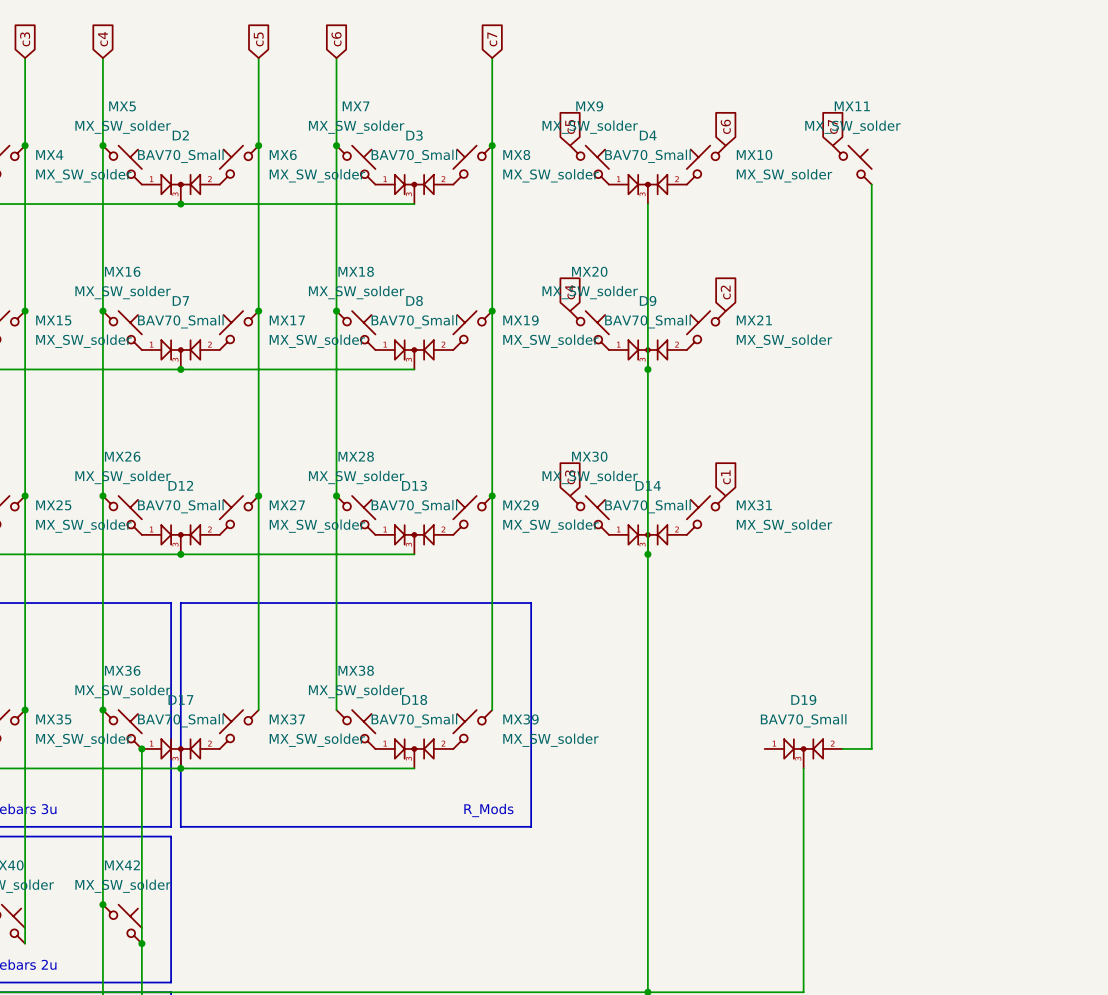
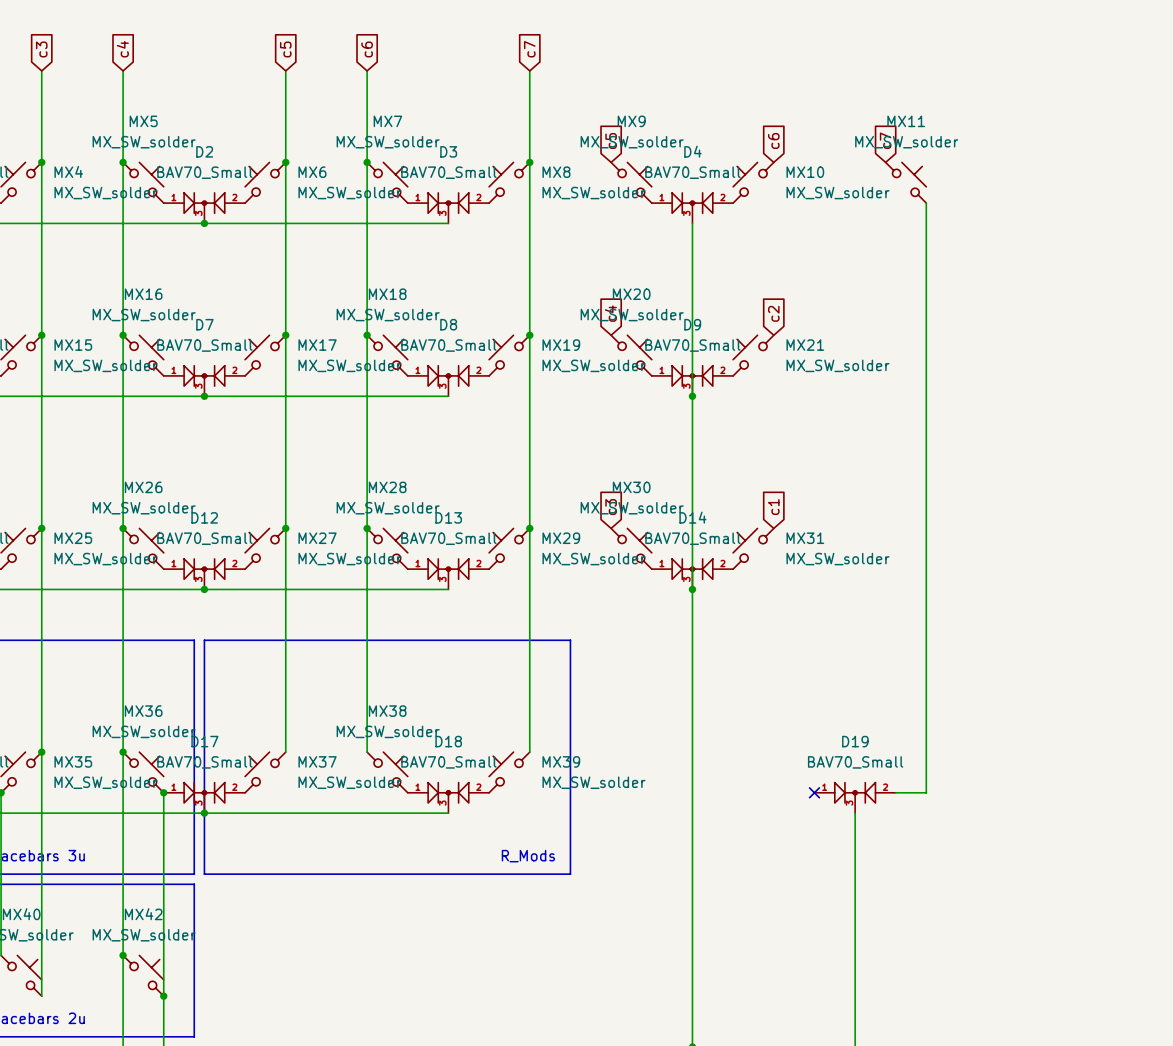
no-connect mark: none -> (814, 792)

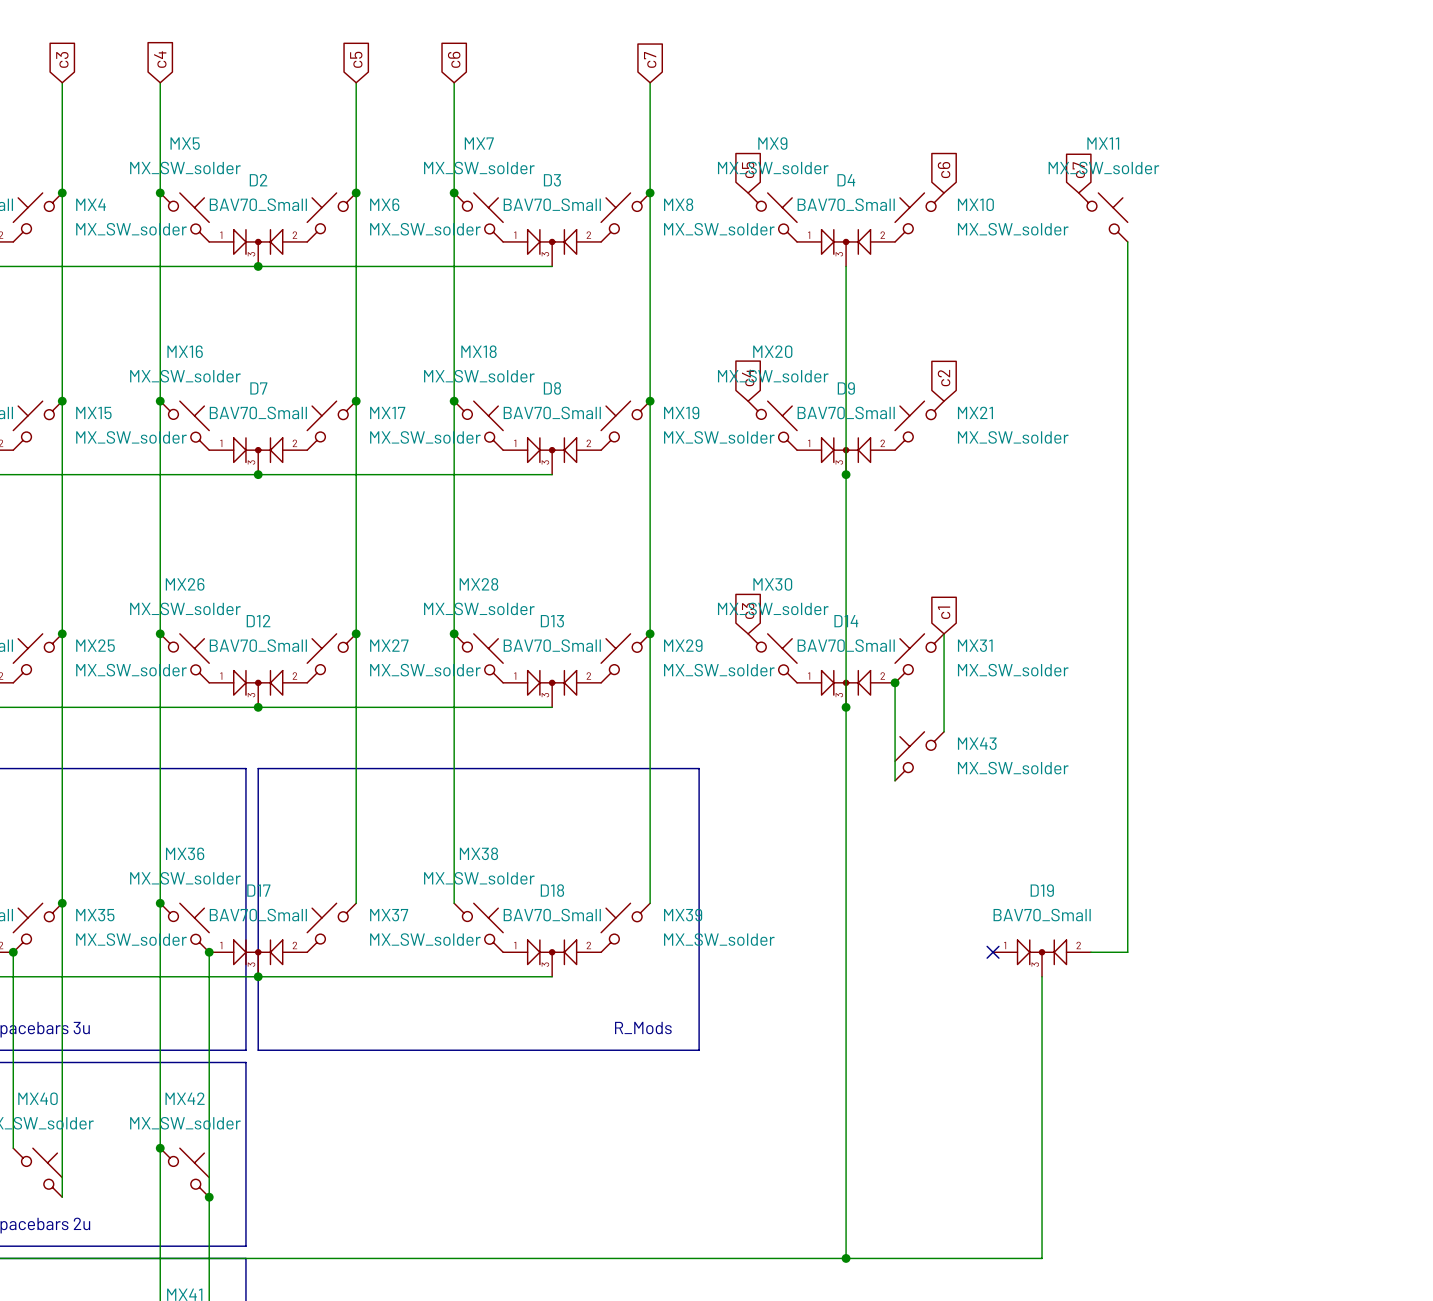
wire: none -> (944, 633) (944, 731)
wire: none -> (895, 682) (895, 780)
junction: none -> (895, 682)
MX43: none -> MX_SW_solder (919, 756)

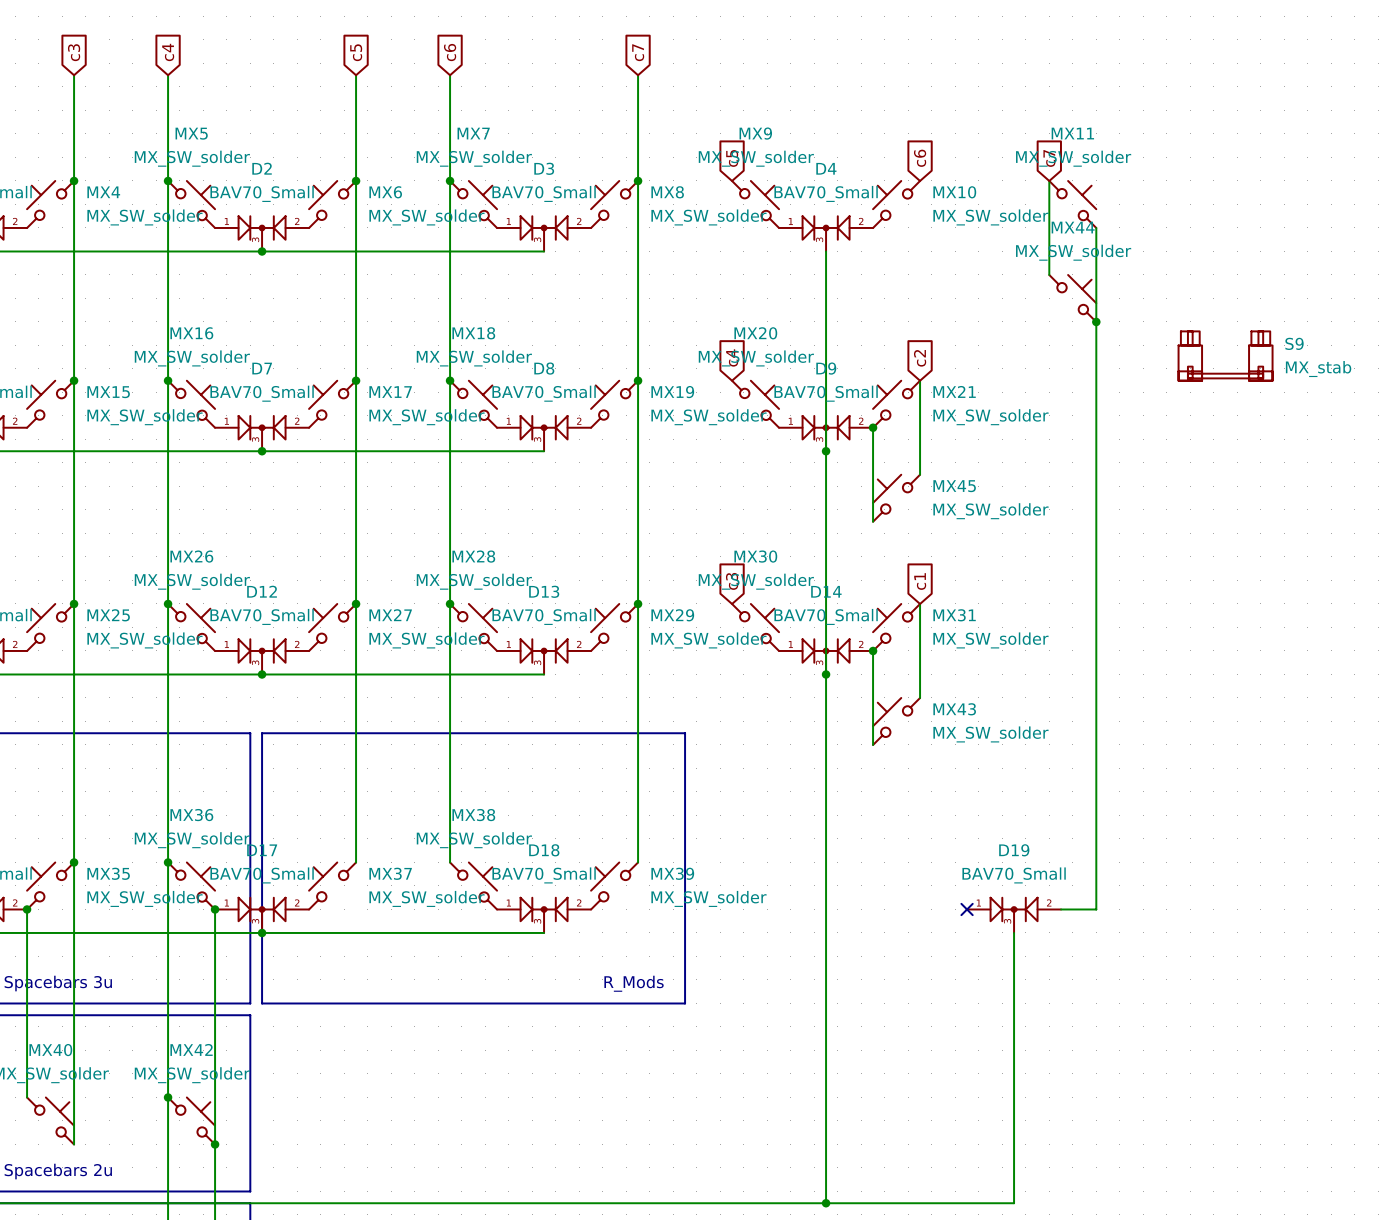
wire: none -> (1049, 180) (1049, 274)
MX44: none -> MX_SW_solder (1072, 298)
junction: none -> (1096, 321)
S9: none -> MX_stab (1225, 356)
wire: none -> (920, 380) (920, 474)
wire: none -> (873, 427) (873, 521)
junction: none -> (873, 427)
MX45: none -> MX_SW_solder (896, 498)

